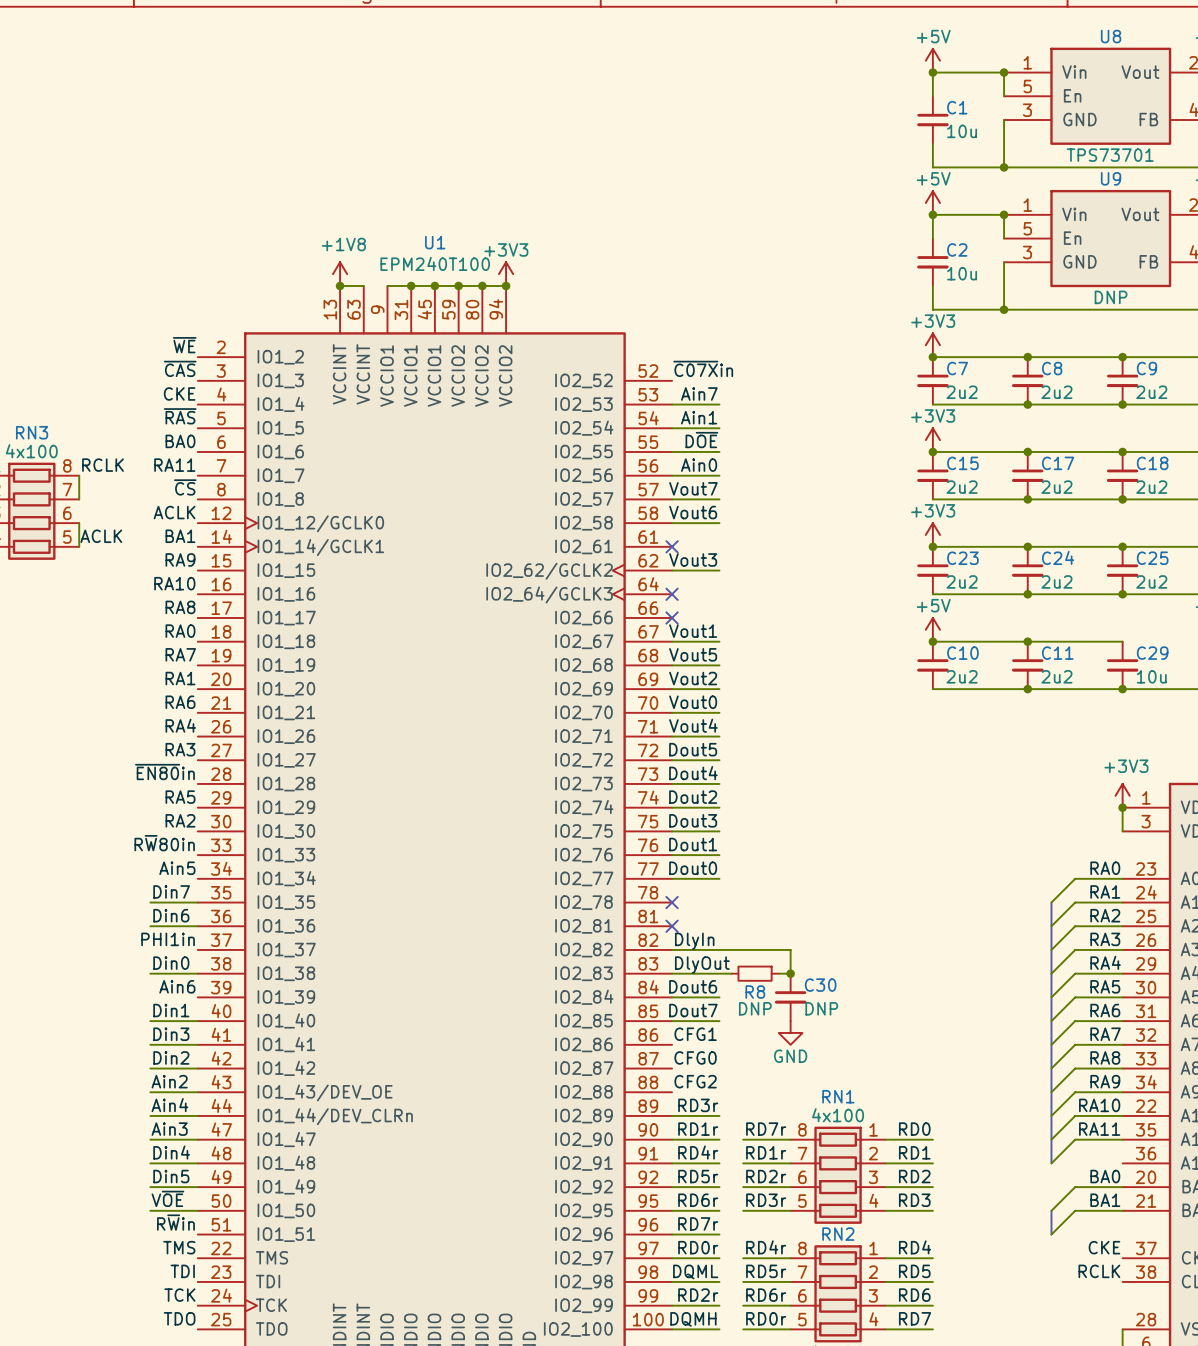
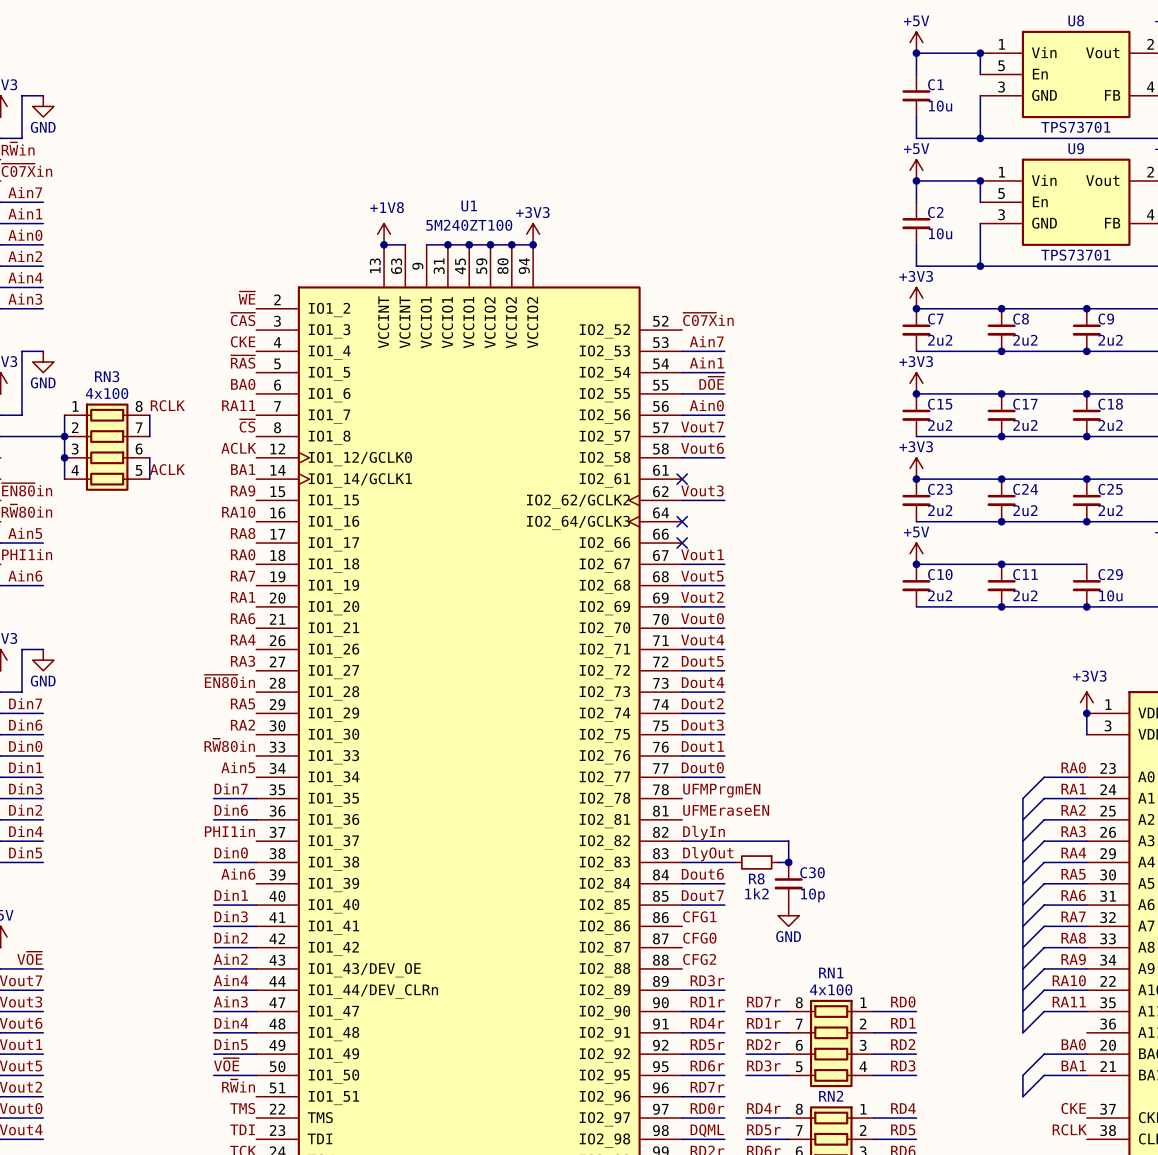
U1 value: EPM240T100 (435, 263) -> 5M240ZT100 (469, 225)
U9 value: DNP (1111, 297) -> TPS73701 (1075, 255)
label: none -> UFMPrgmEN (721, 790)
no-connect mark: (672, 902) -> none
label: none -> UFMEraseEN (726, 810)
no-connect mark: (672, 926) -> none
R8 value: DNP (755, 1008) -> 1k2 (756, 893)
C30 value: DNP (821, 1008) -> 10p (812, 895)

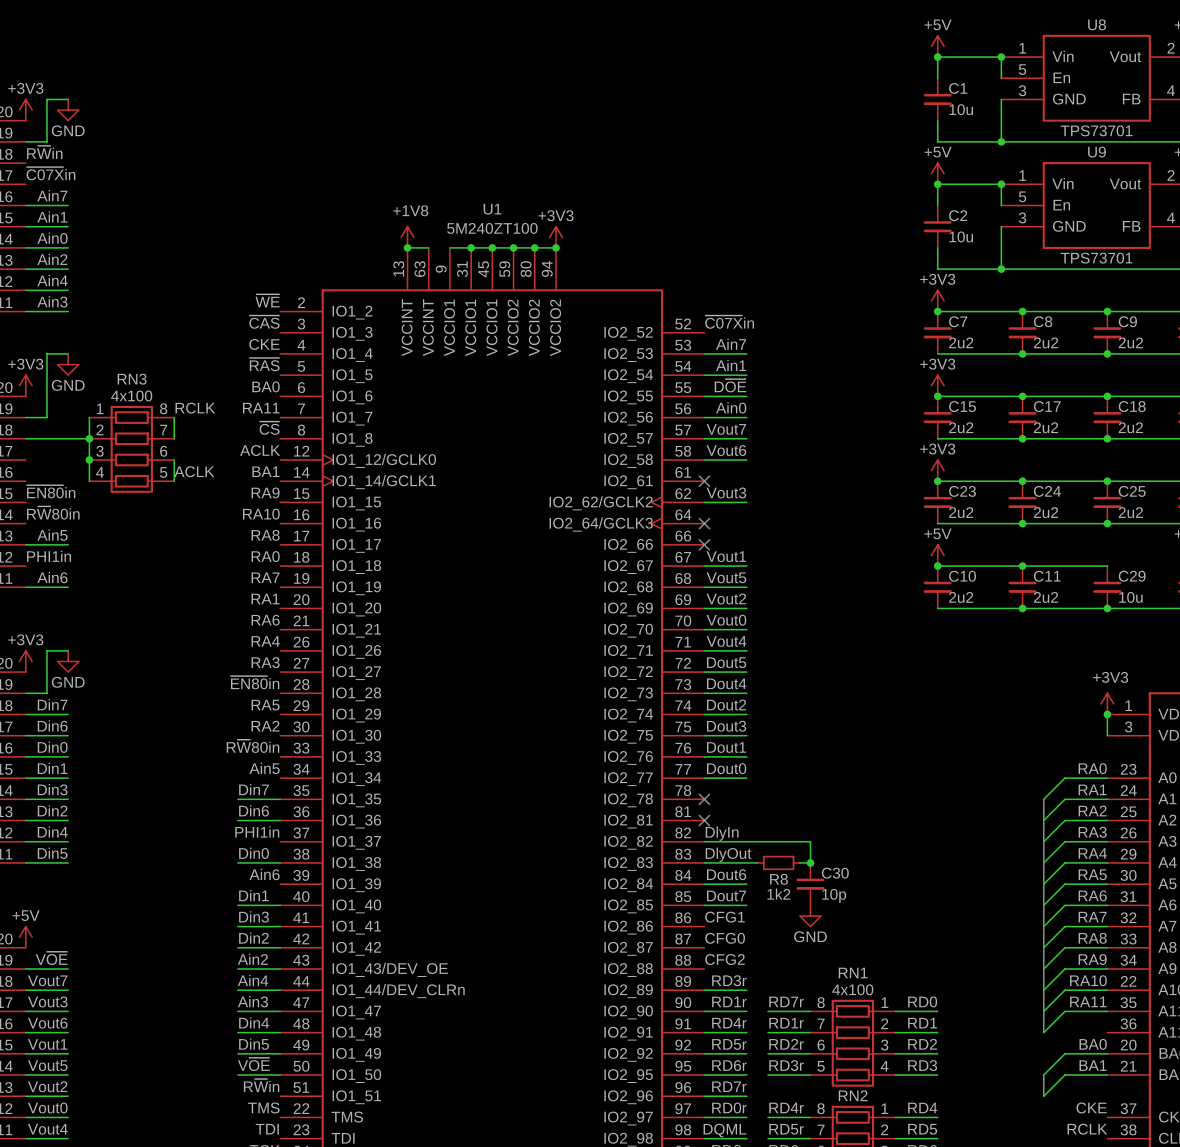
label: UFMPrgmEN (721, 790) -> none
no-connect mark: none -> (704, 799)
label: UFMEraseEN (726, 810) -> none
no-connect mark: none -> (704, 820)

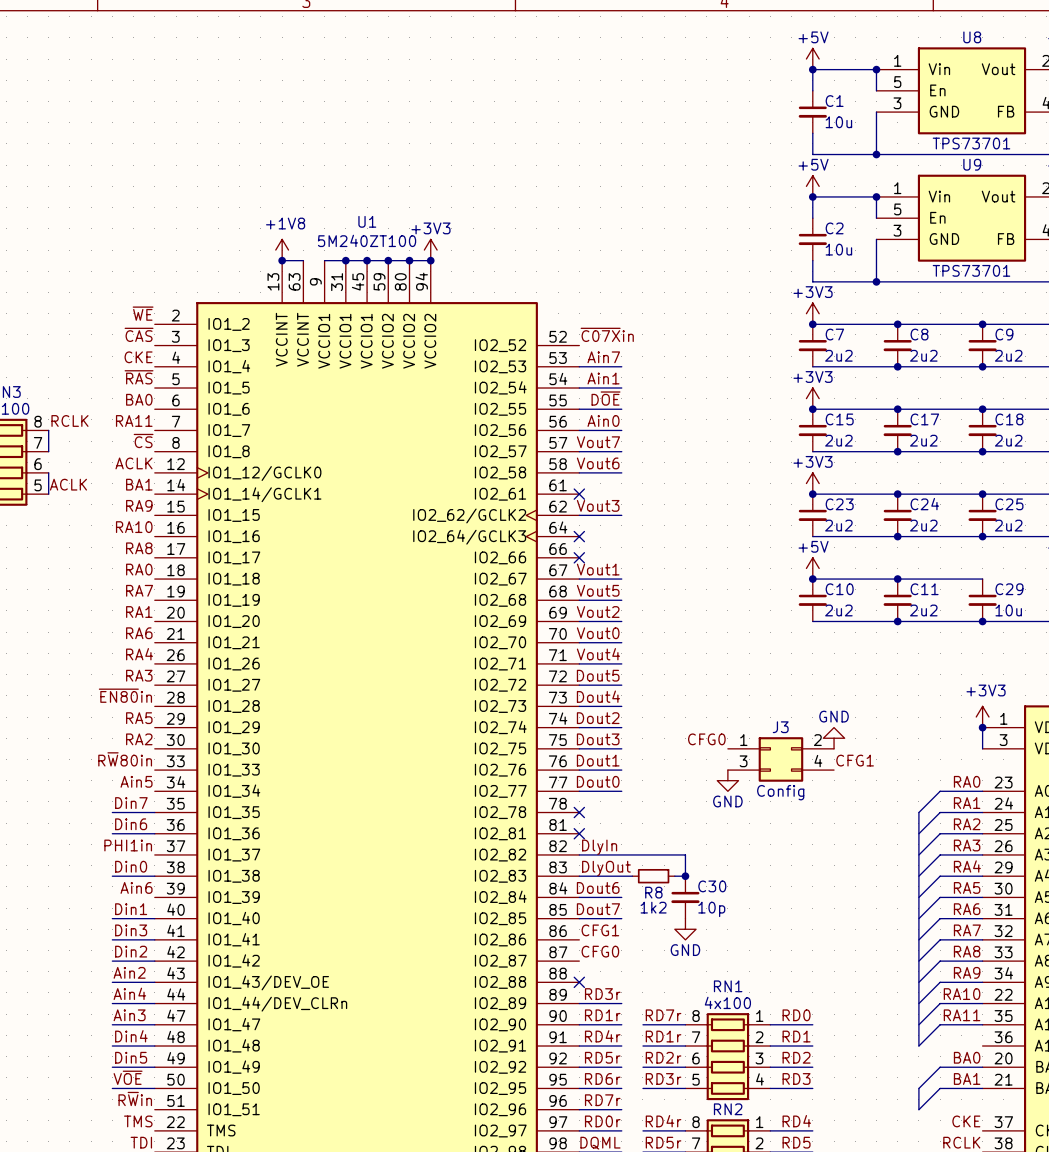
power symbol: none -> GND (834, 738)
label: none -> CFG0 (706, 739)
J3: none -> Config (780, 759)
label: none -> CFG1 (855, 760)
power symbol: none -> GND (727, 780)
label: CFG2 (725, 959) -> none
no-connect mark: none -> (579, 982)

